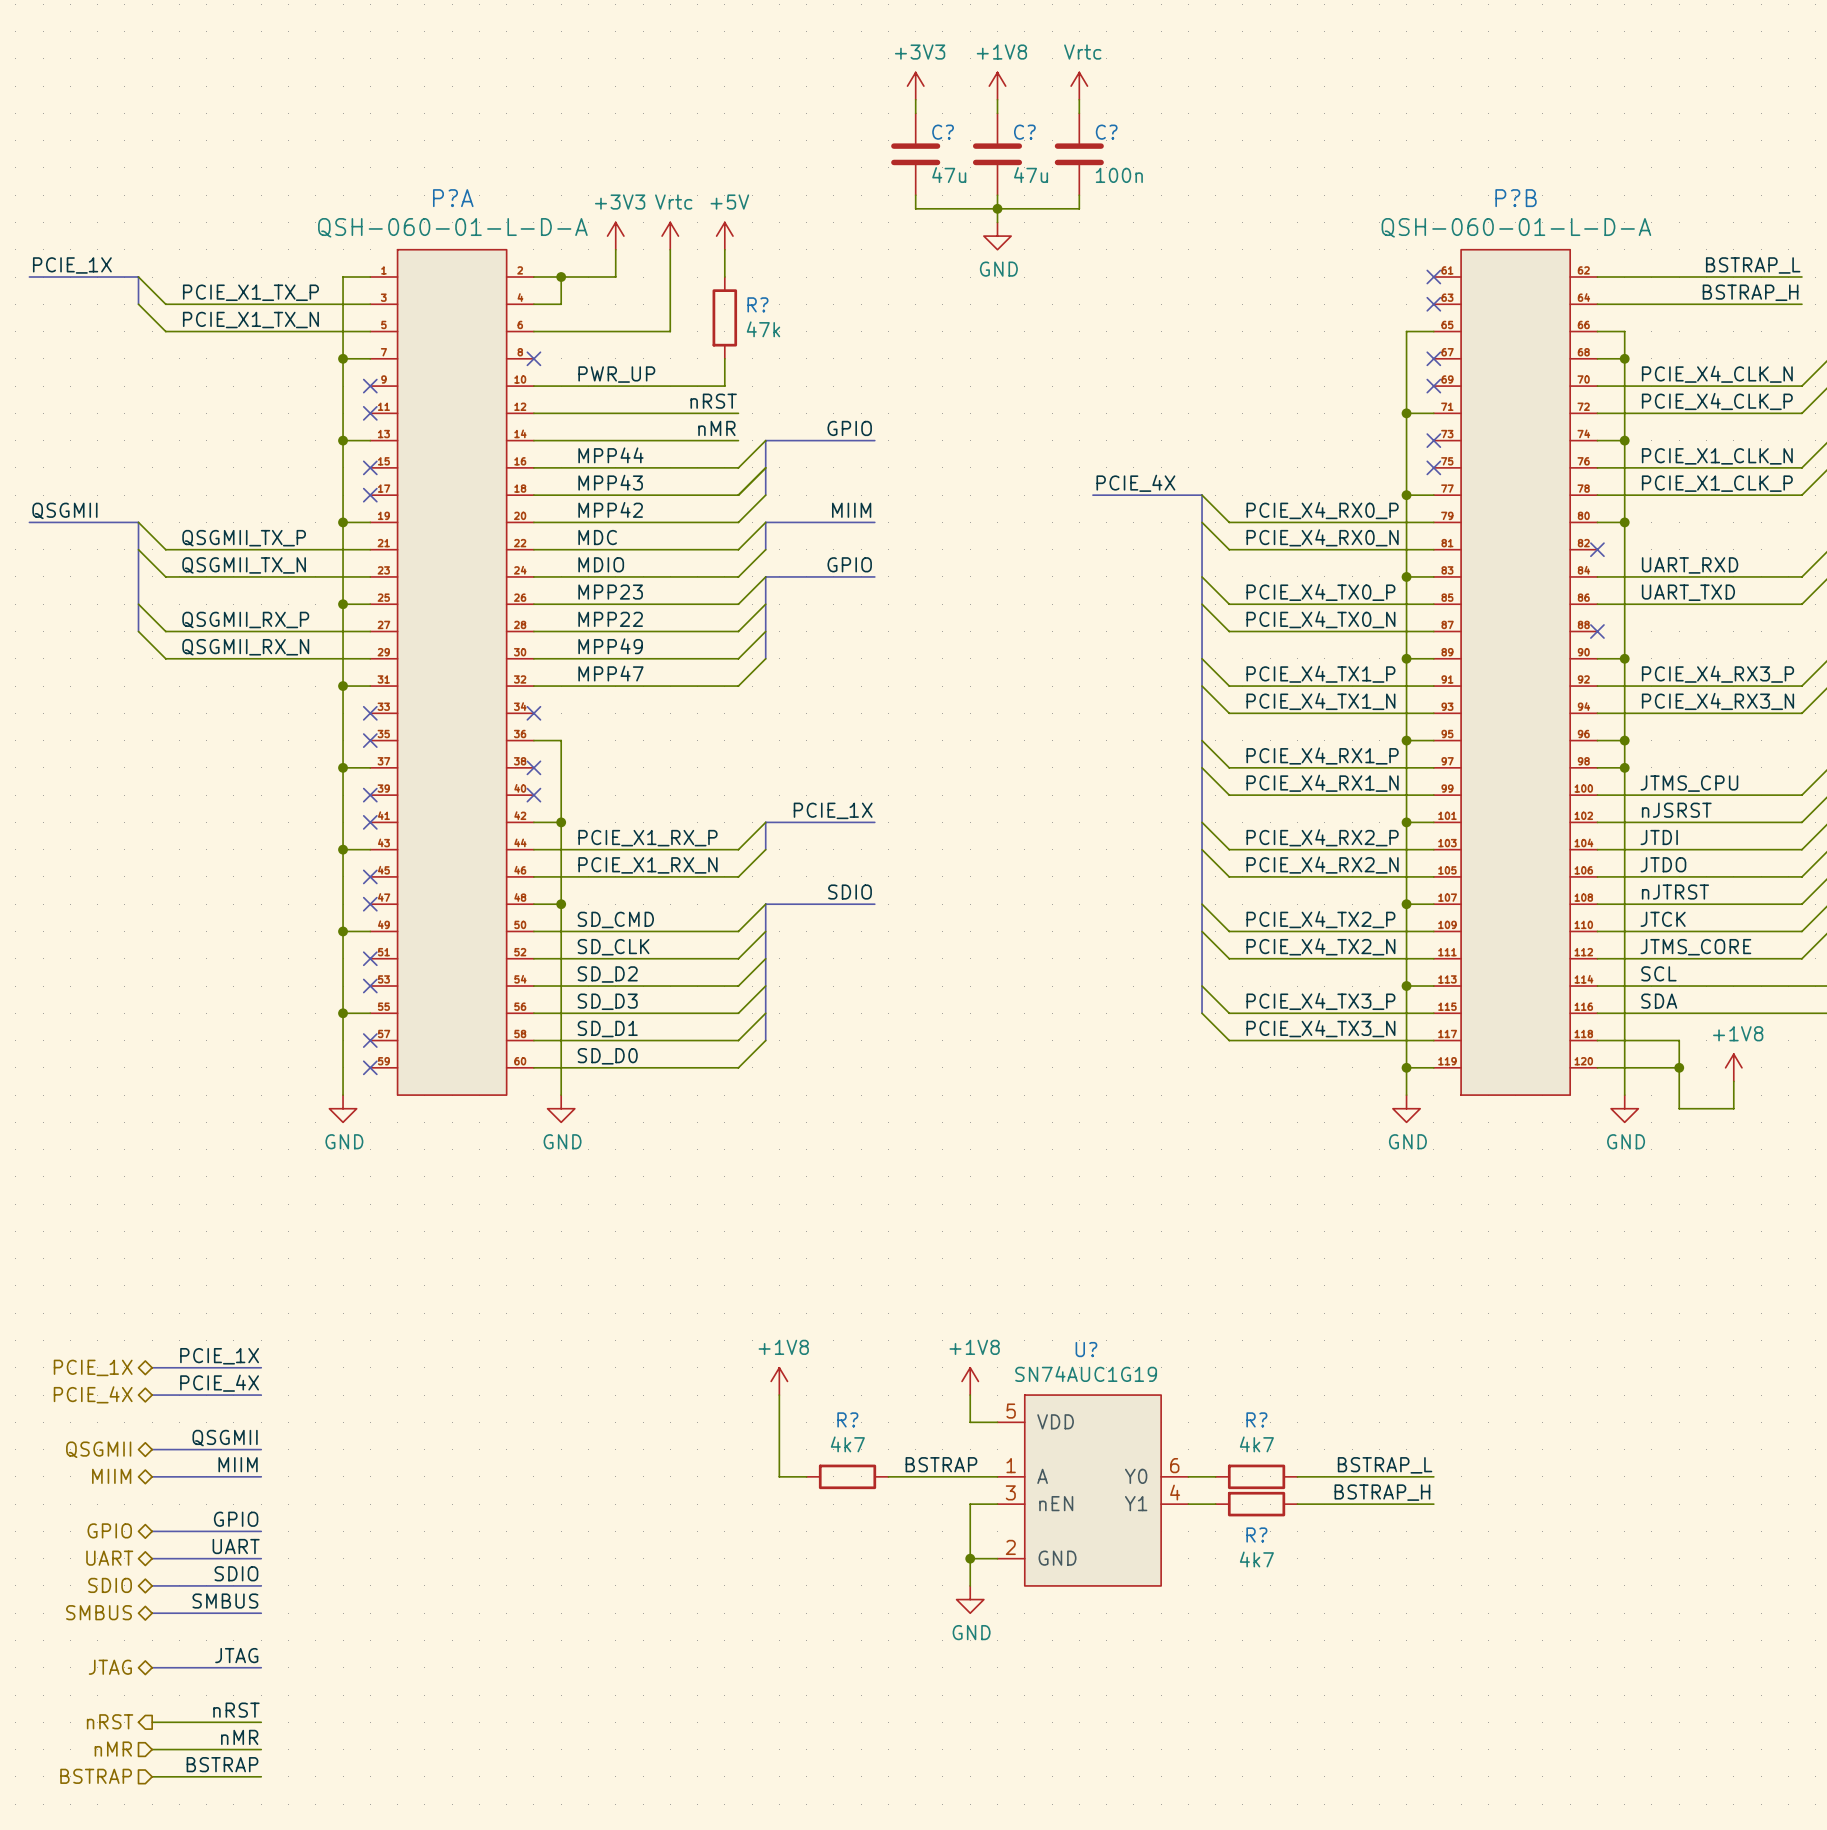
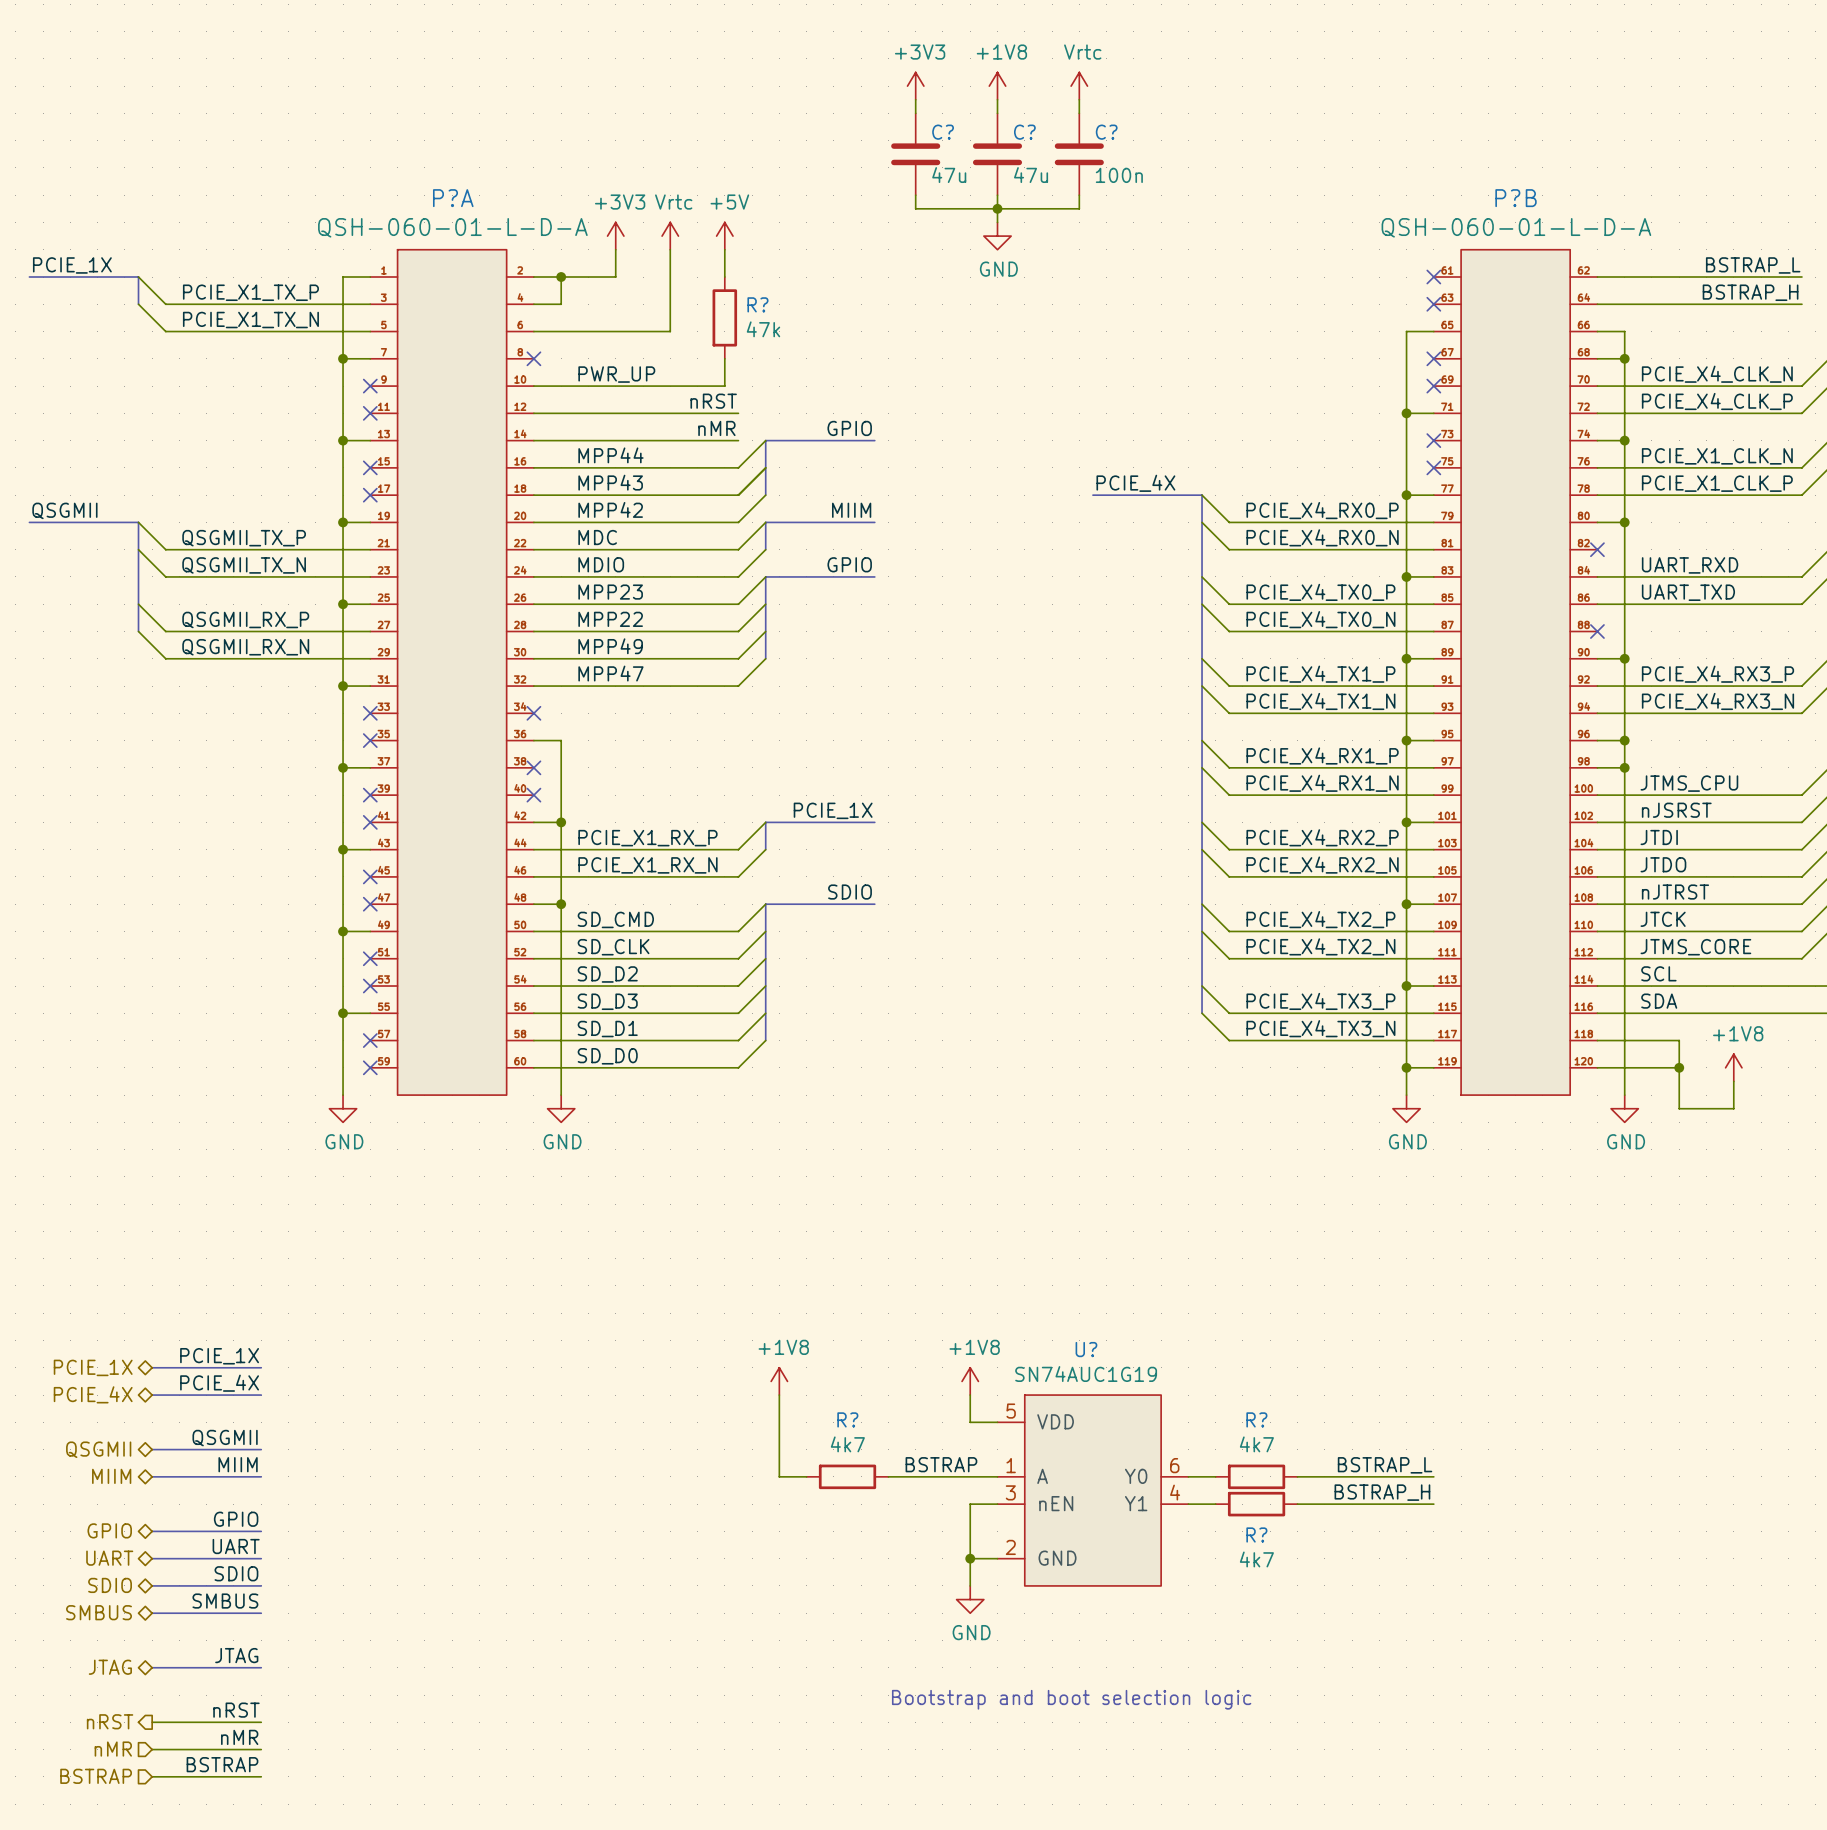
text: none -> Bootstrap and boot selection logic (1071, 1699)

